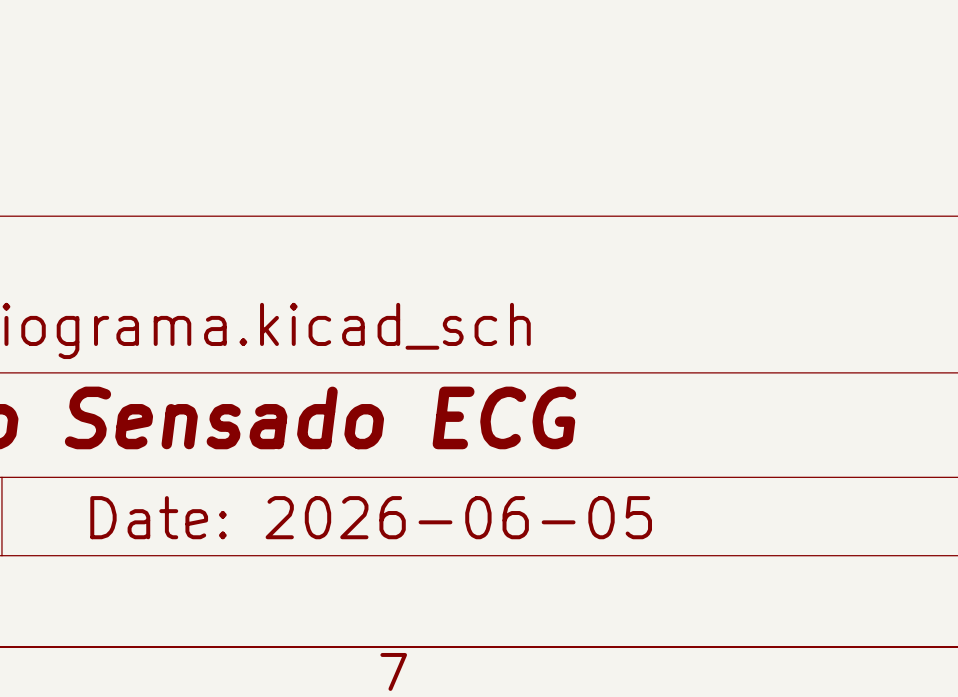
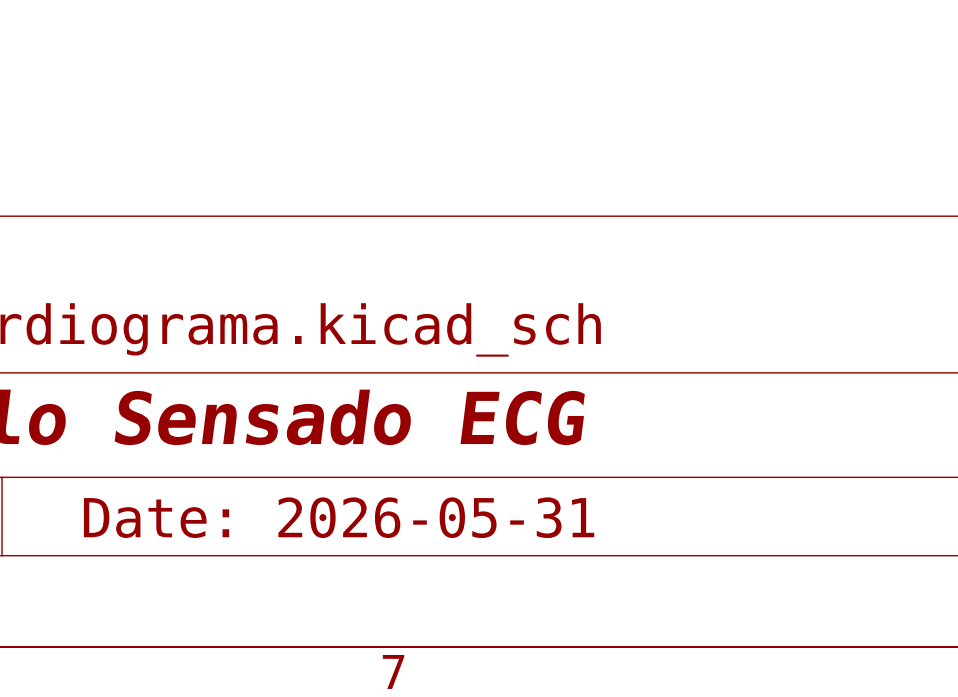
title block: Date: 2026-06-05 (371, 517) -> Date: 2026-05-31 (339, 517)

